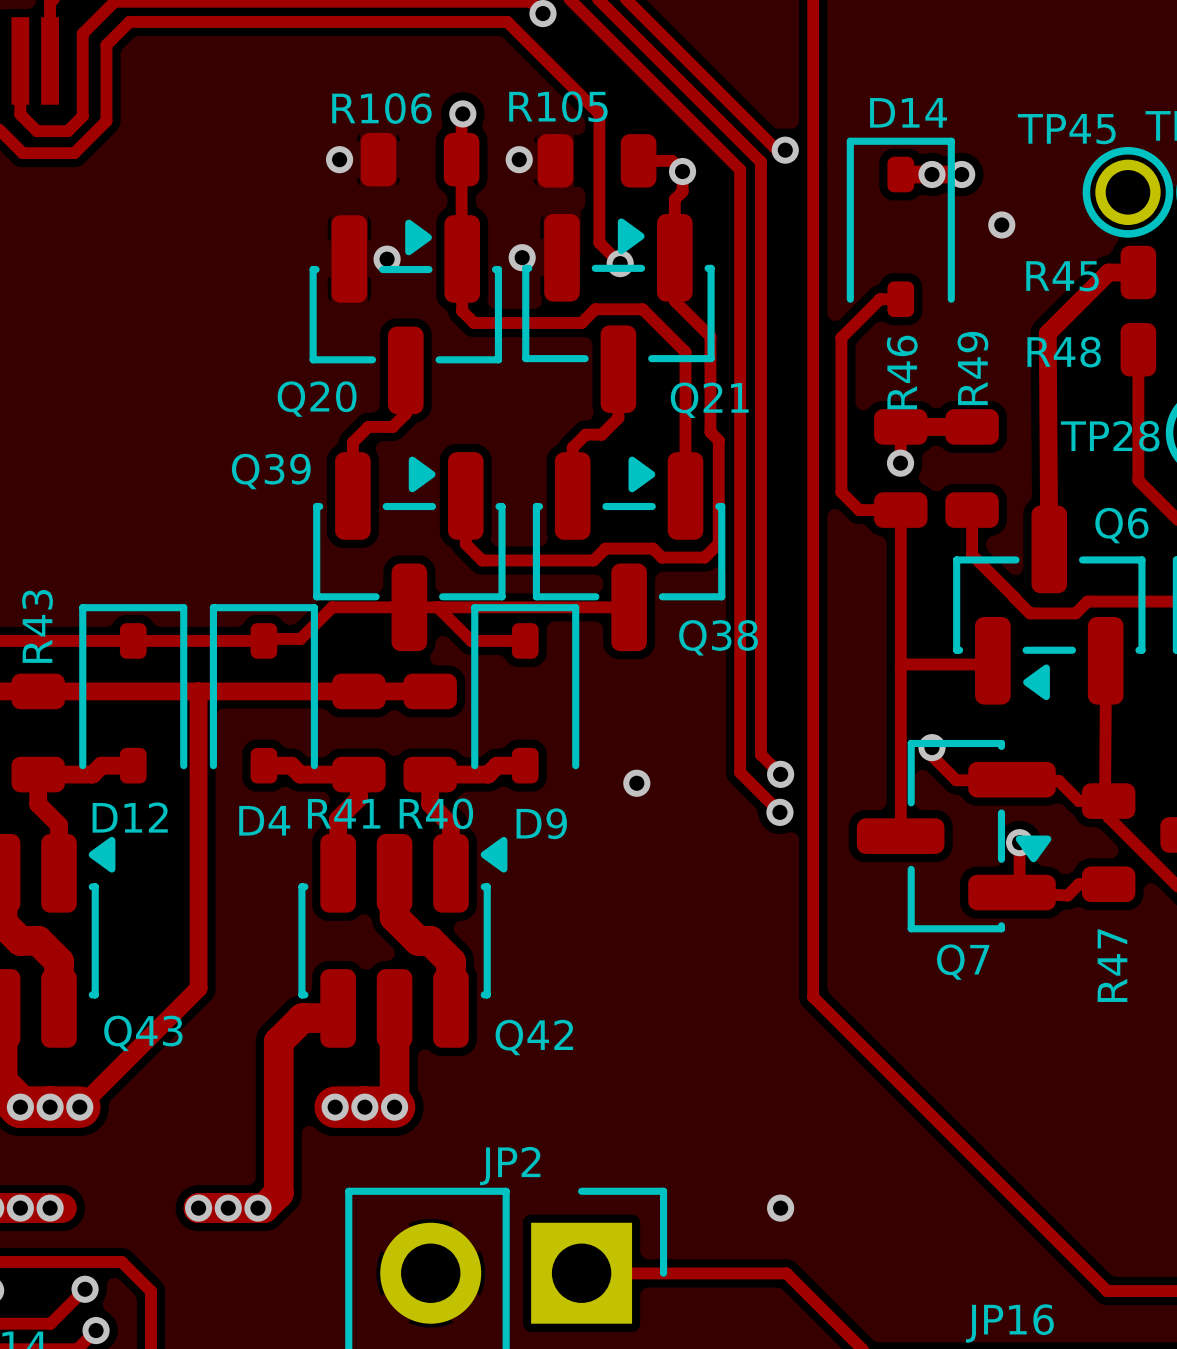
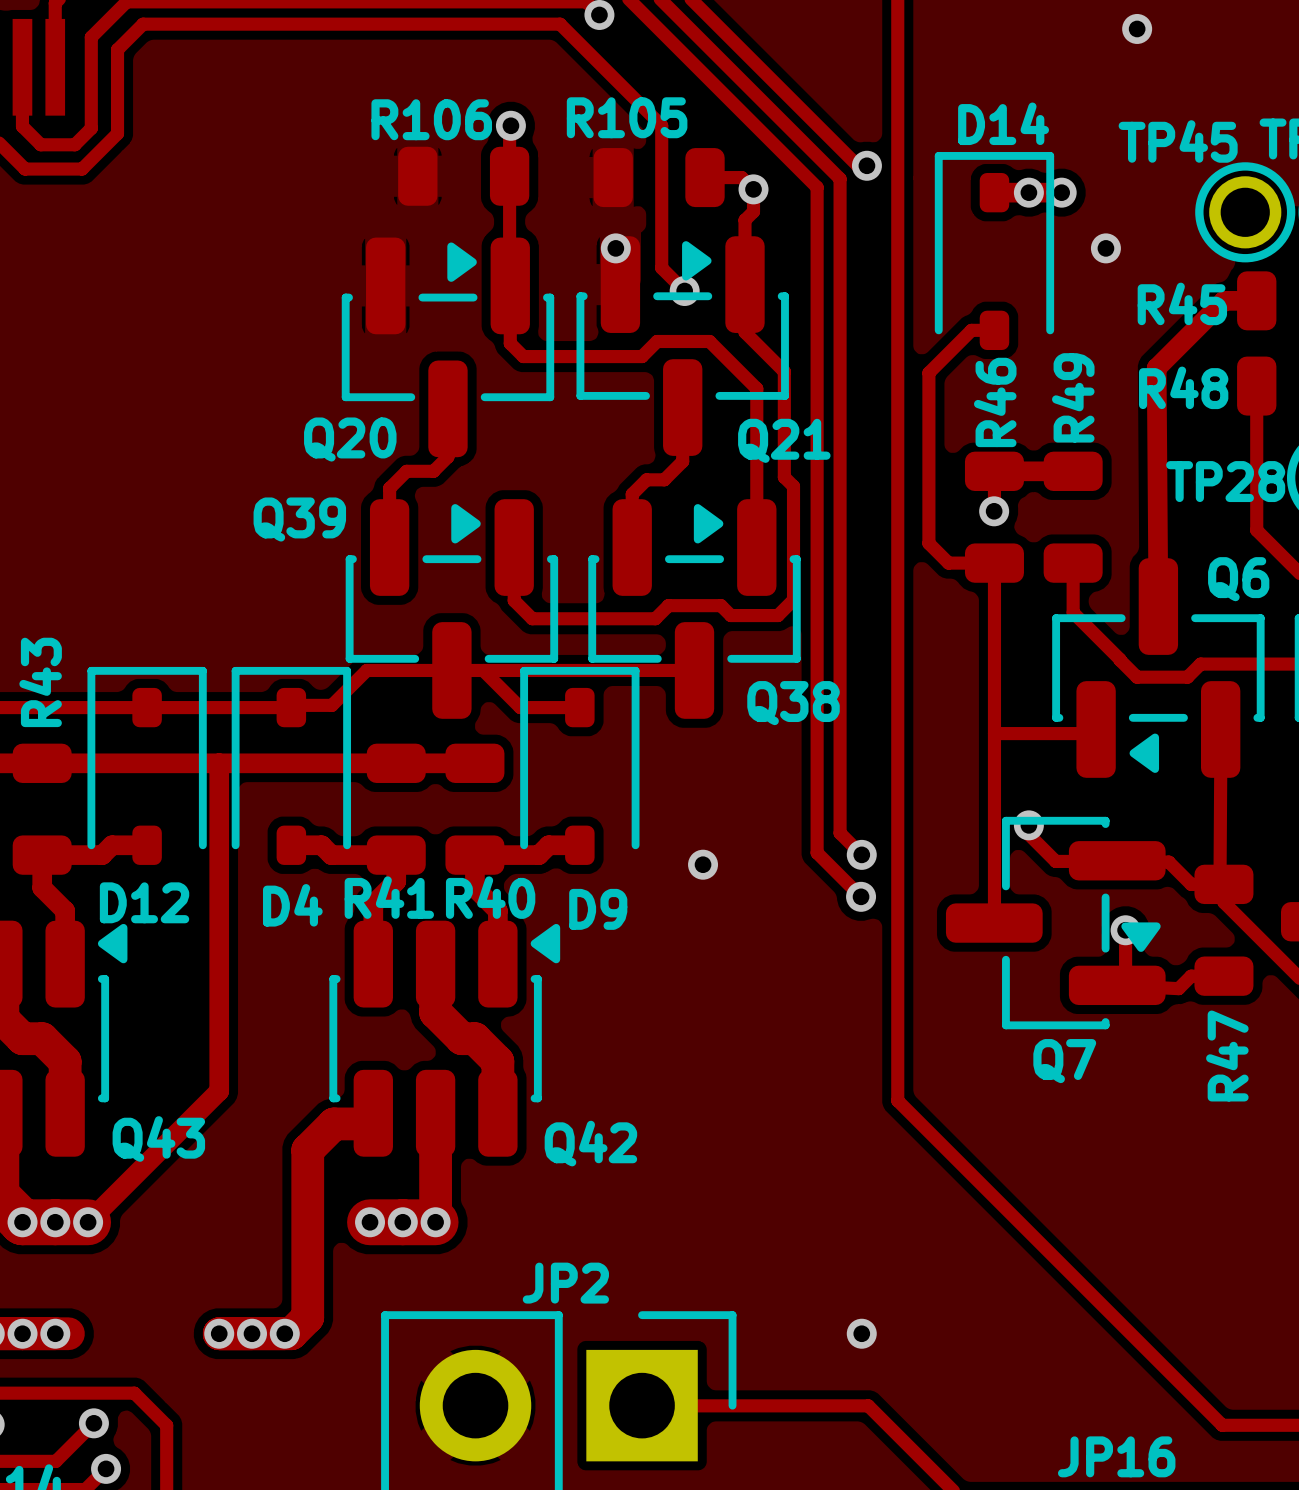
via: none -> (1137, 28)
via: (339, 159) -> none
via: (519, 159) -> none
via: none -> (615, 248)
via: (522, 257) -> none
via: (387, 259) -> none

